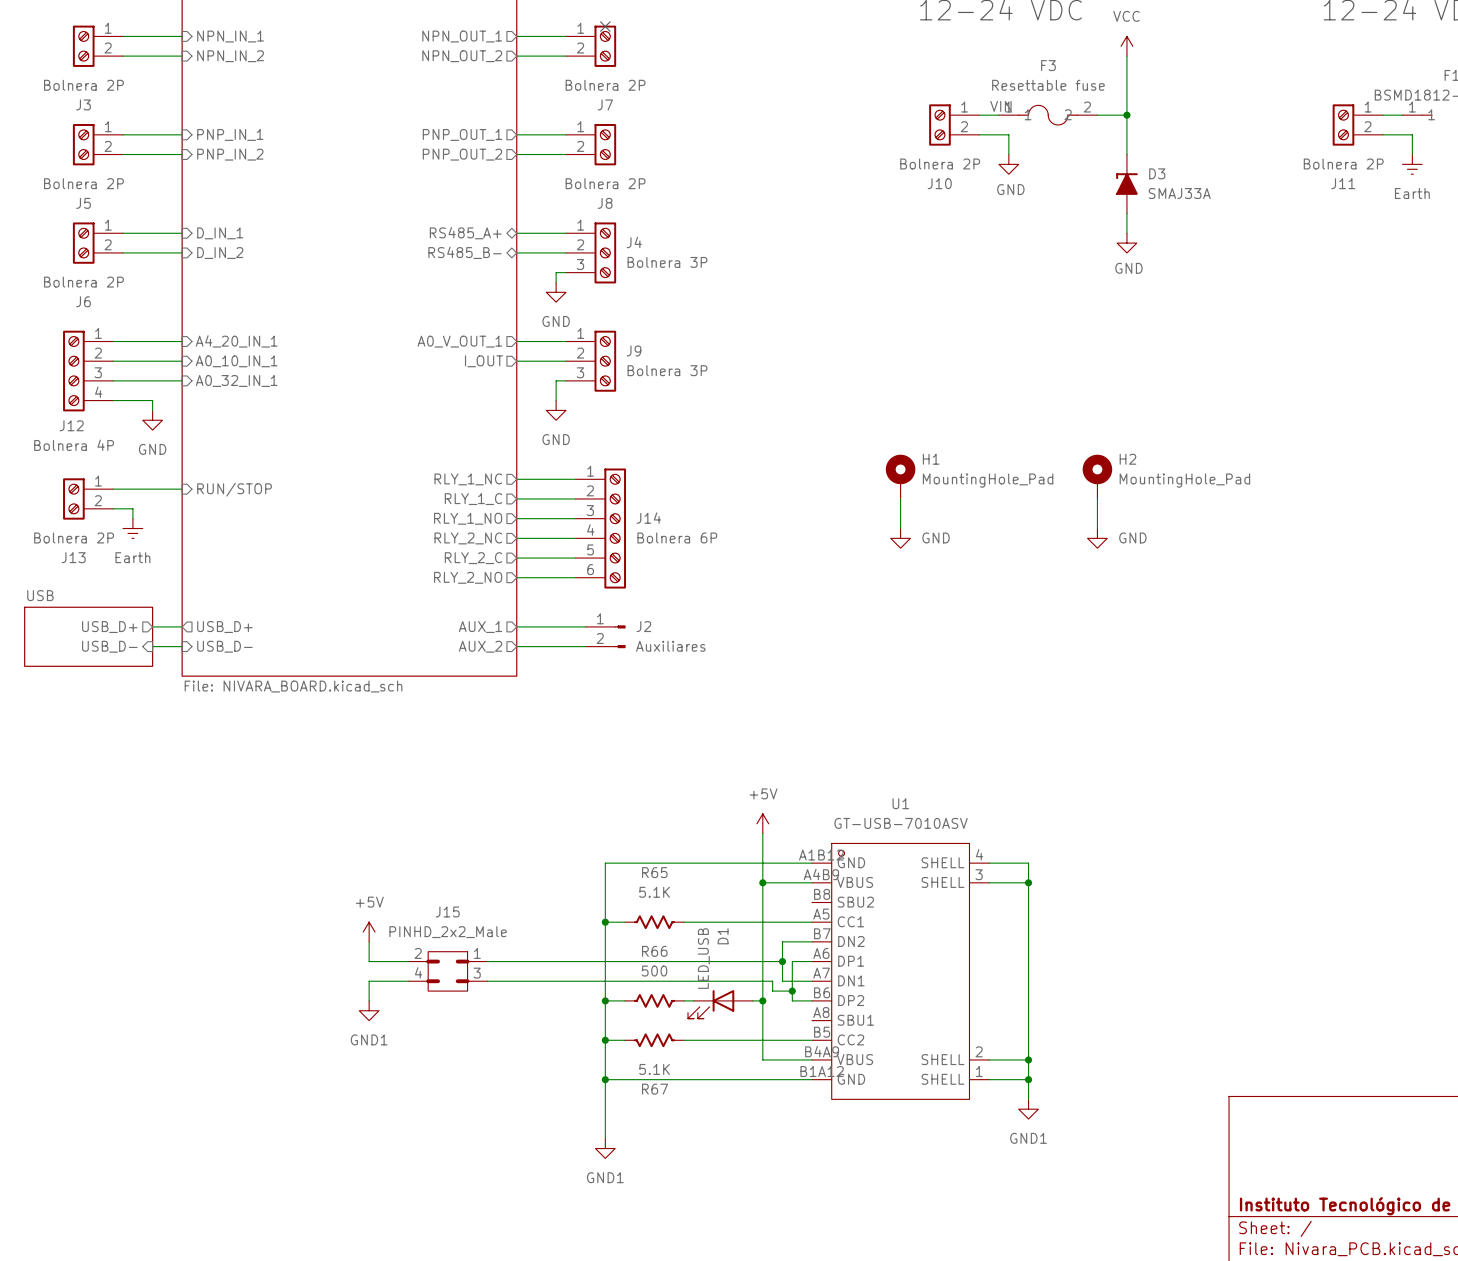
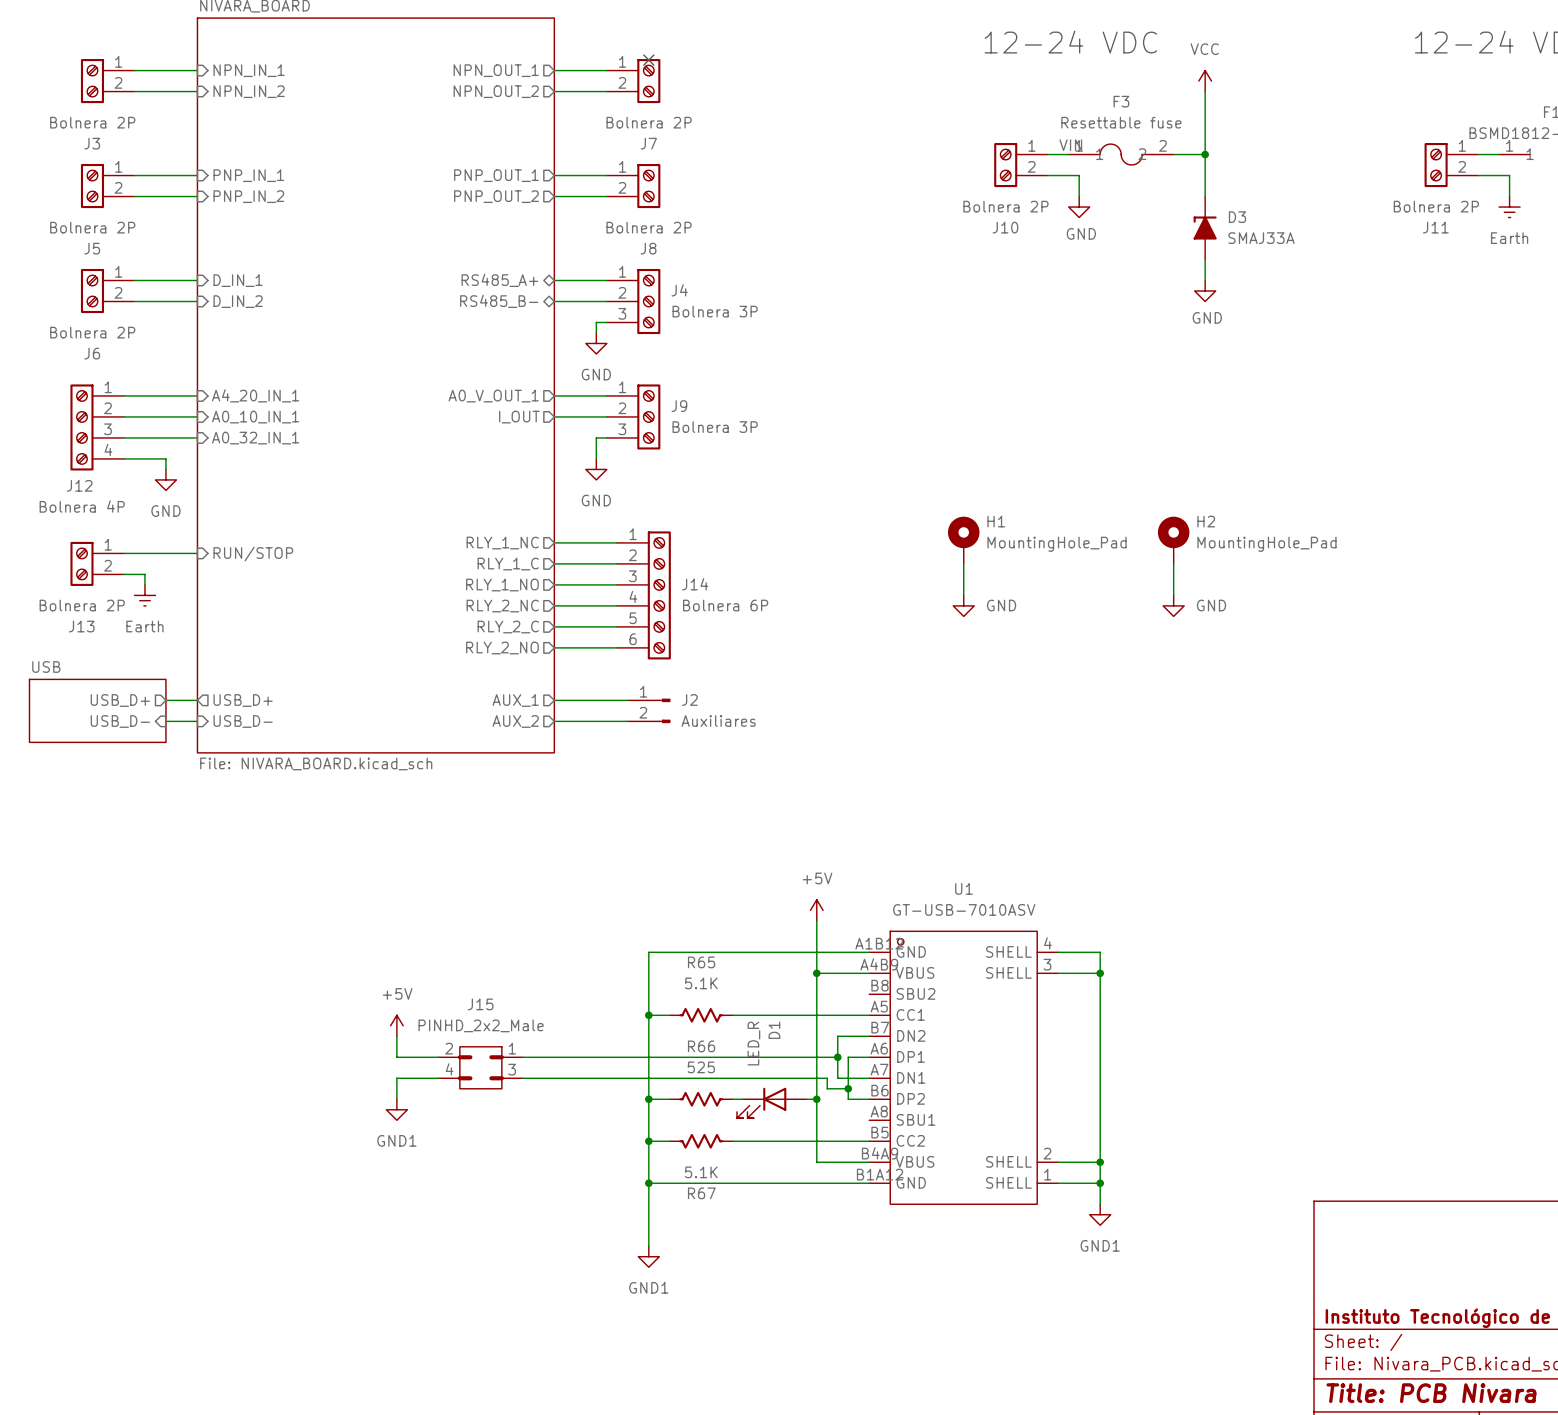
D1 value: LED_USB (703, 958) -> LED_R (753, 1043)
R66 value: 500 (654, 971) -> 525 (701, 1067)

